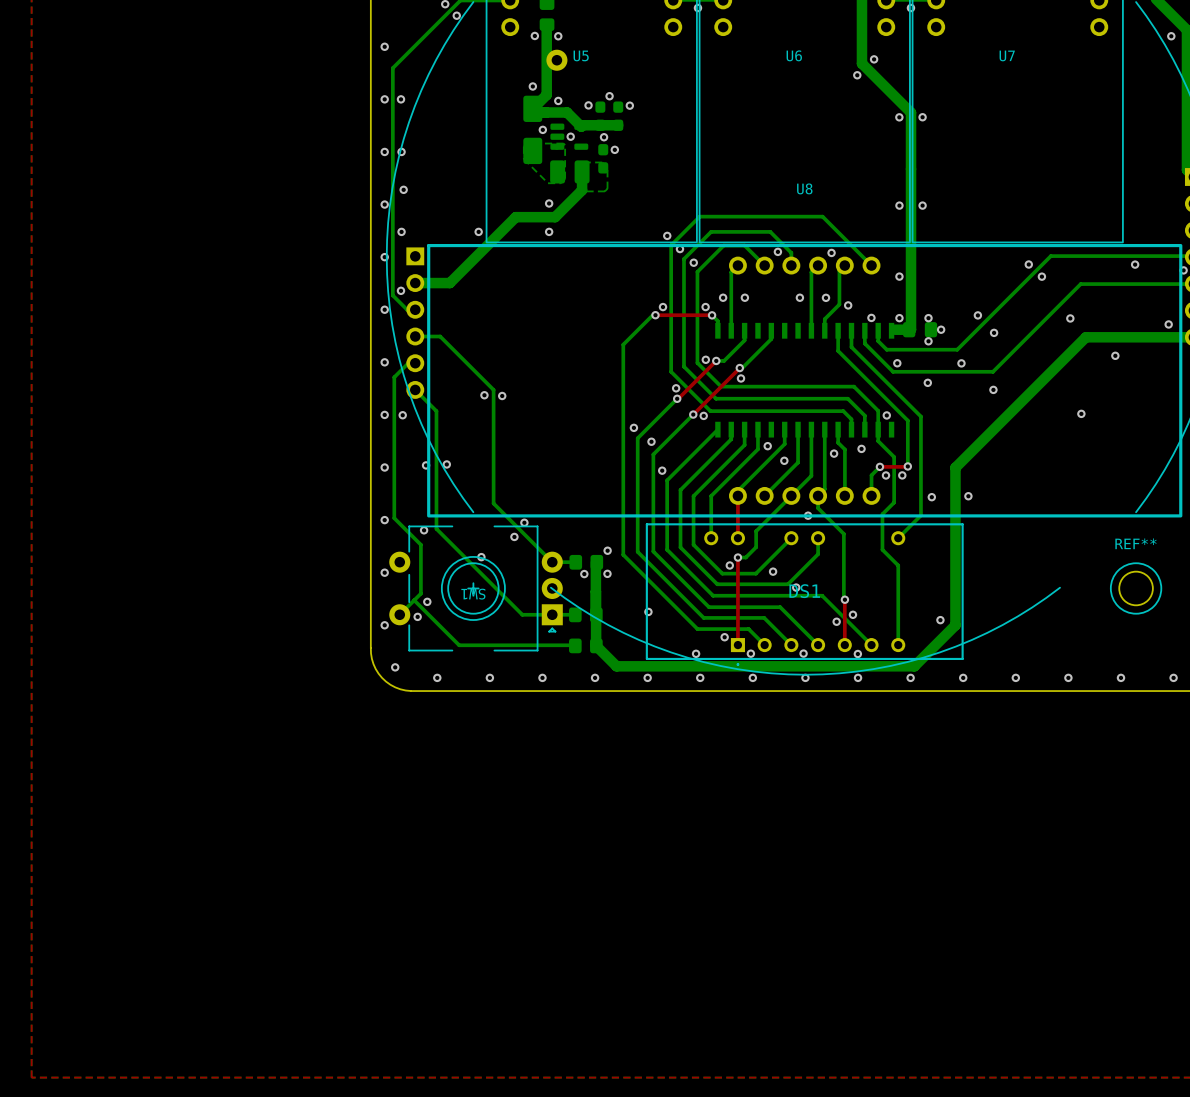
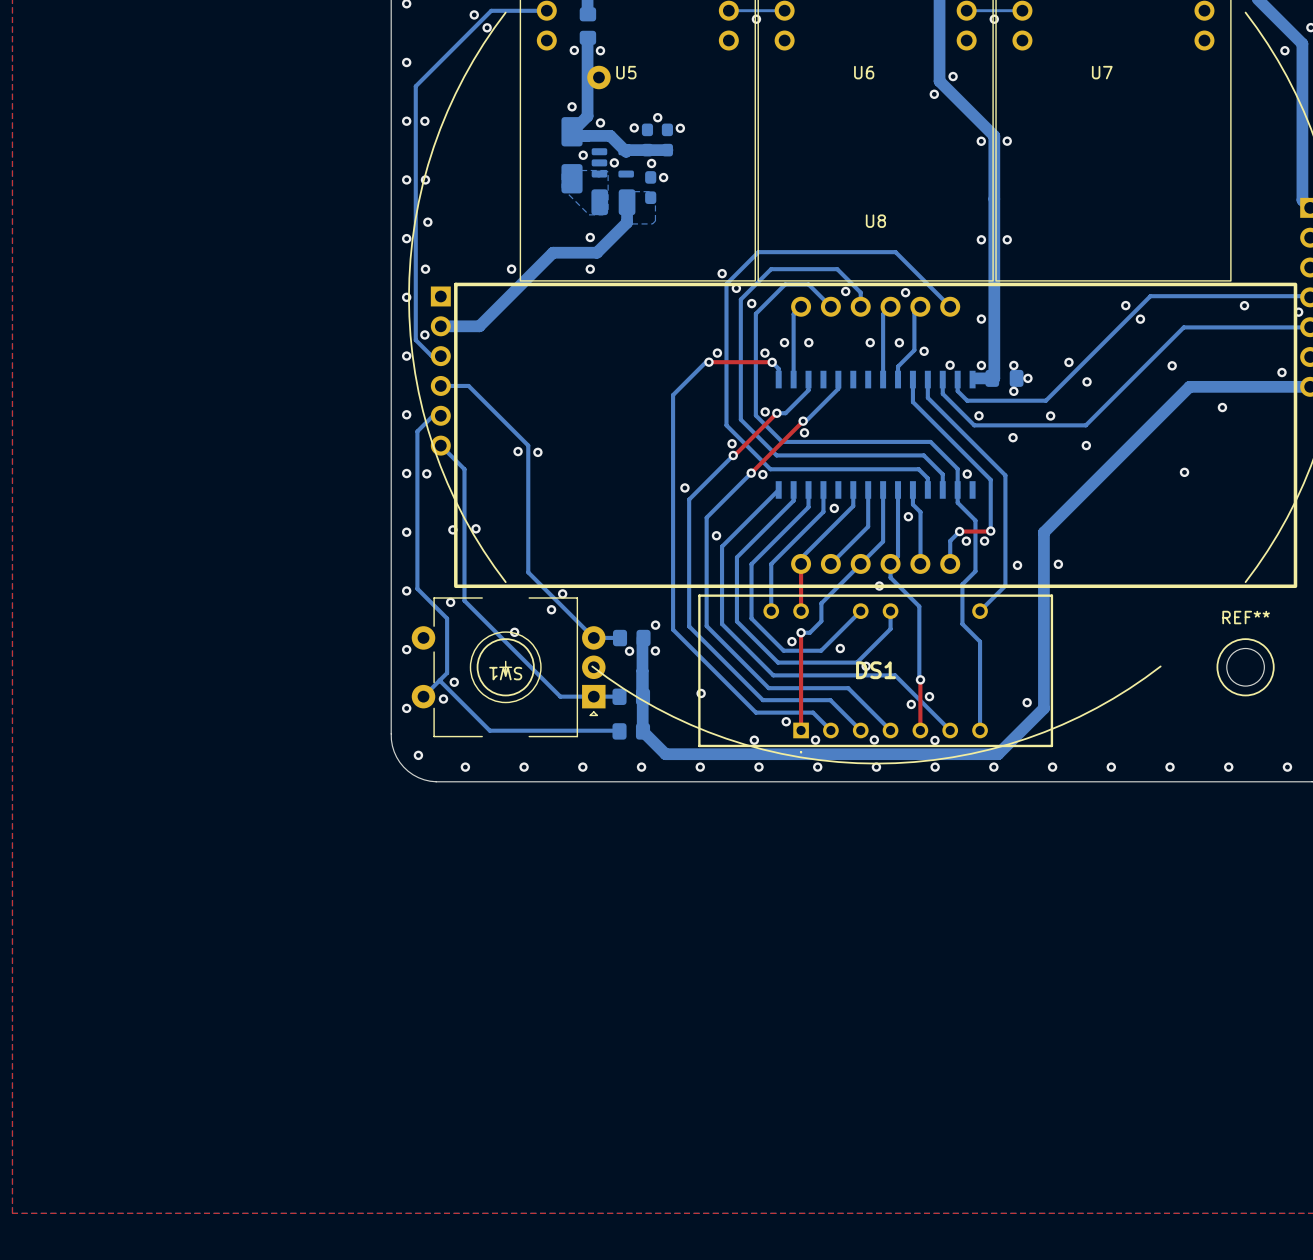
via: (651, 441) -> none
via: (861, 448) -> none
via: (784, 460) -> none

